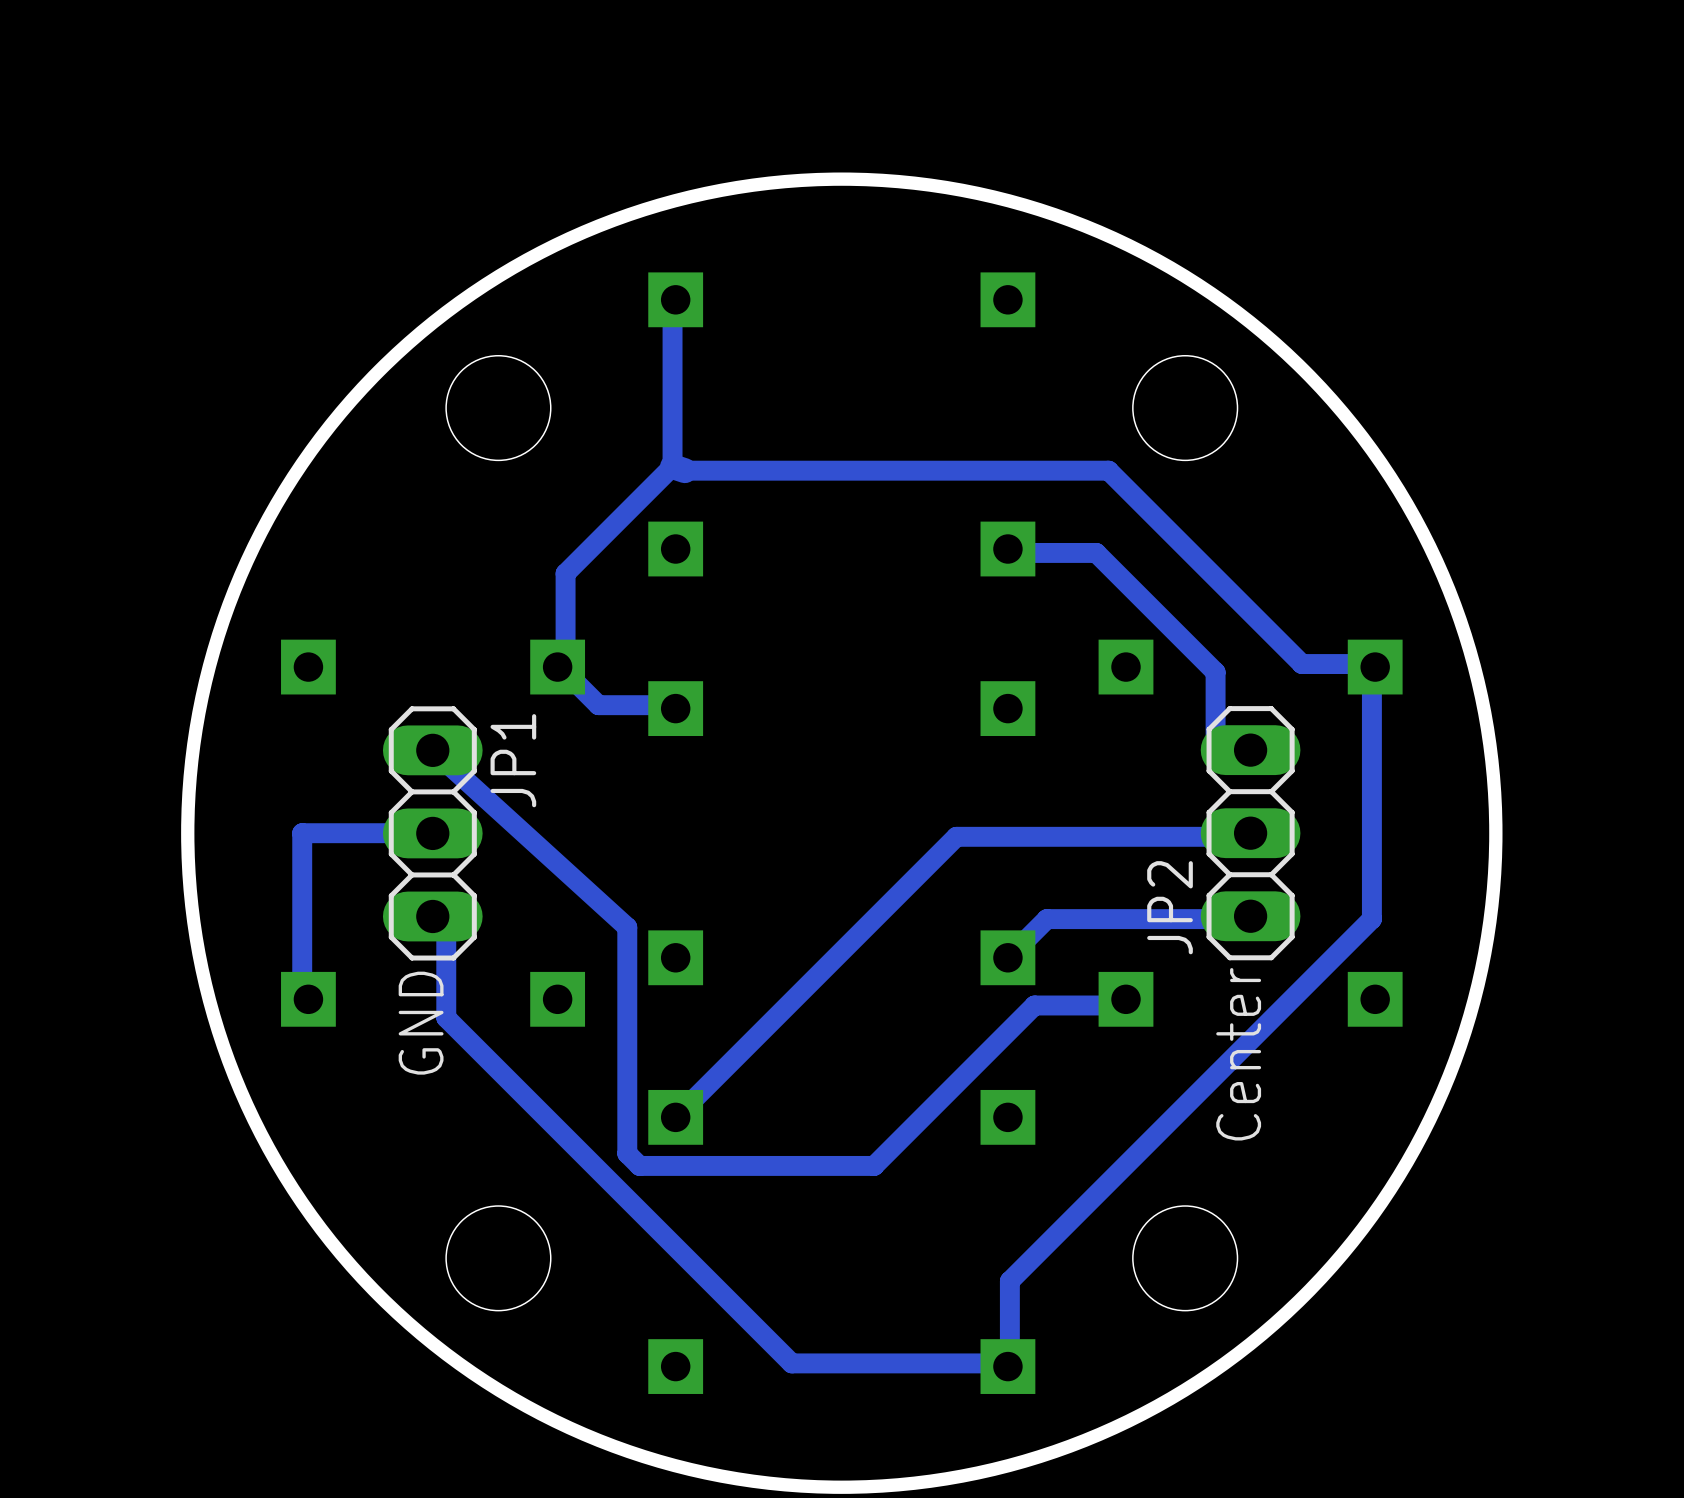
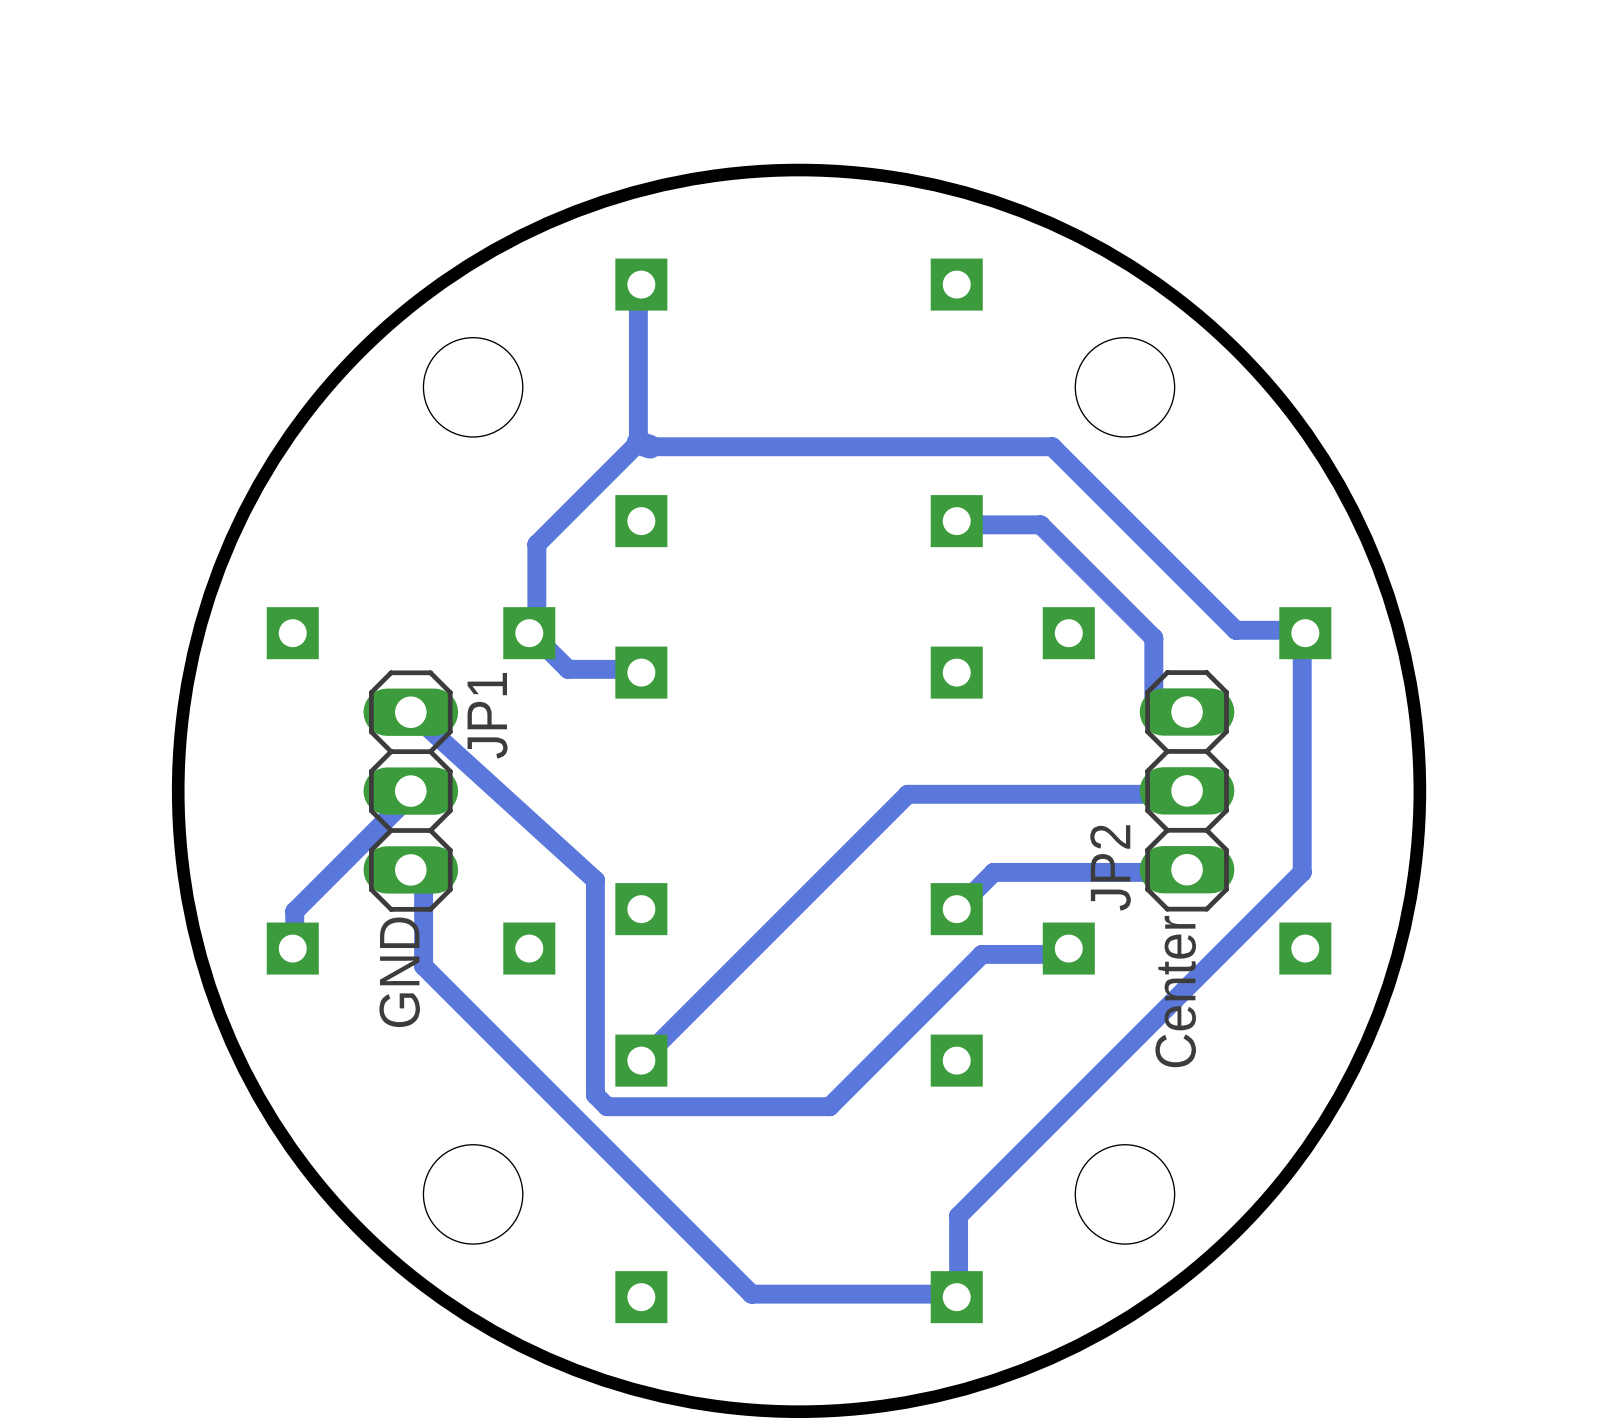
track: (432, 833) (302, 833) (302, 999) (308, 999) -> (410, 791) (419, 794) (411, 794) (294, 911) (294, 946) (292, 948)

